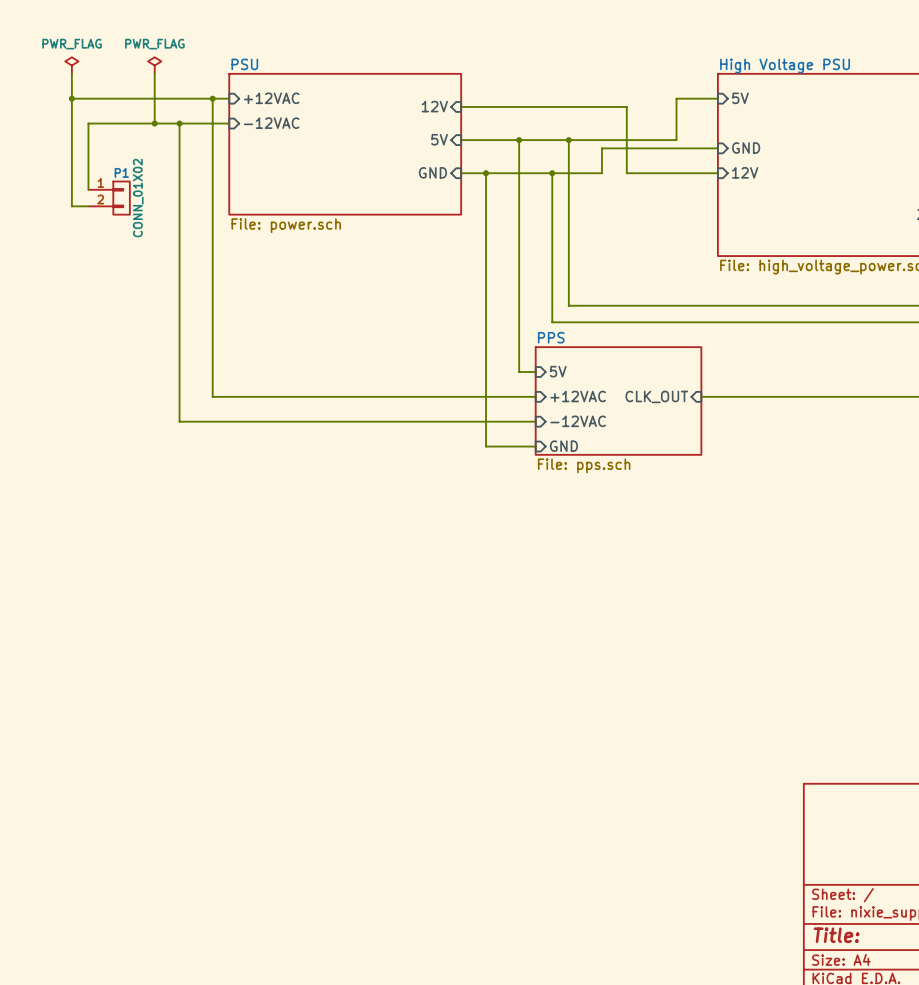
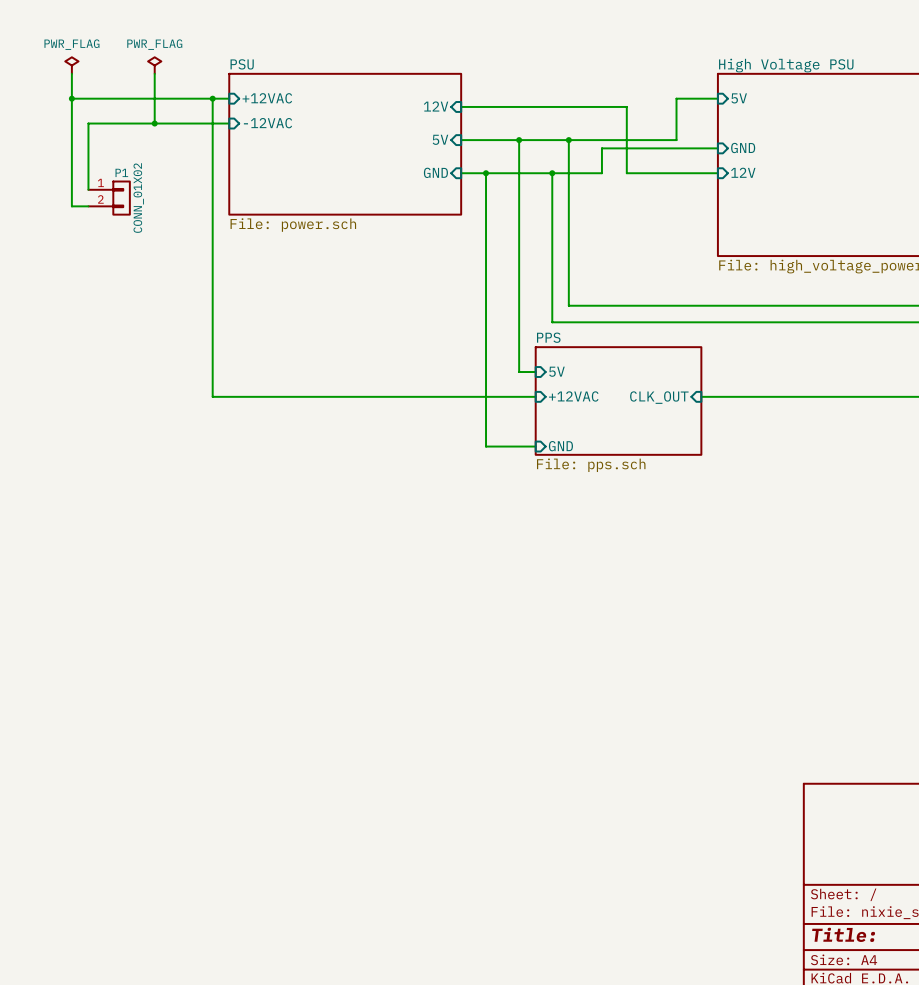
wire: (179, 123) (179, 421) (535, 421) -> none
junction: (179, 123) -> none
sheet pin: -12VAC (578, 421) -> none

